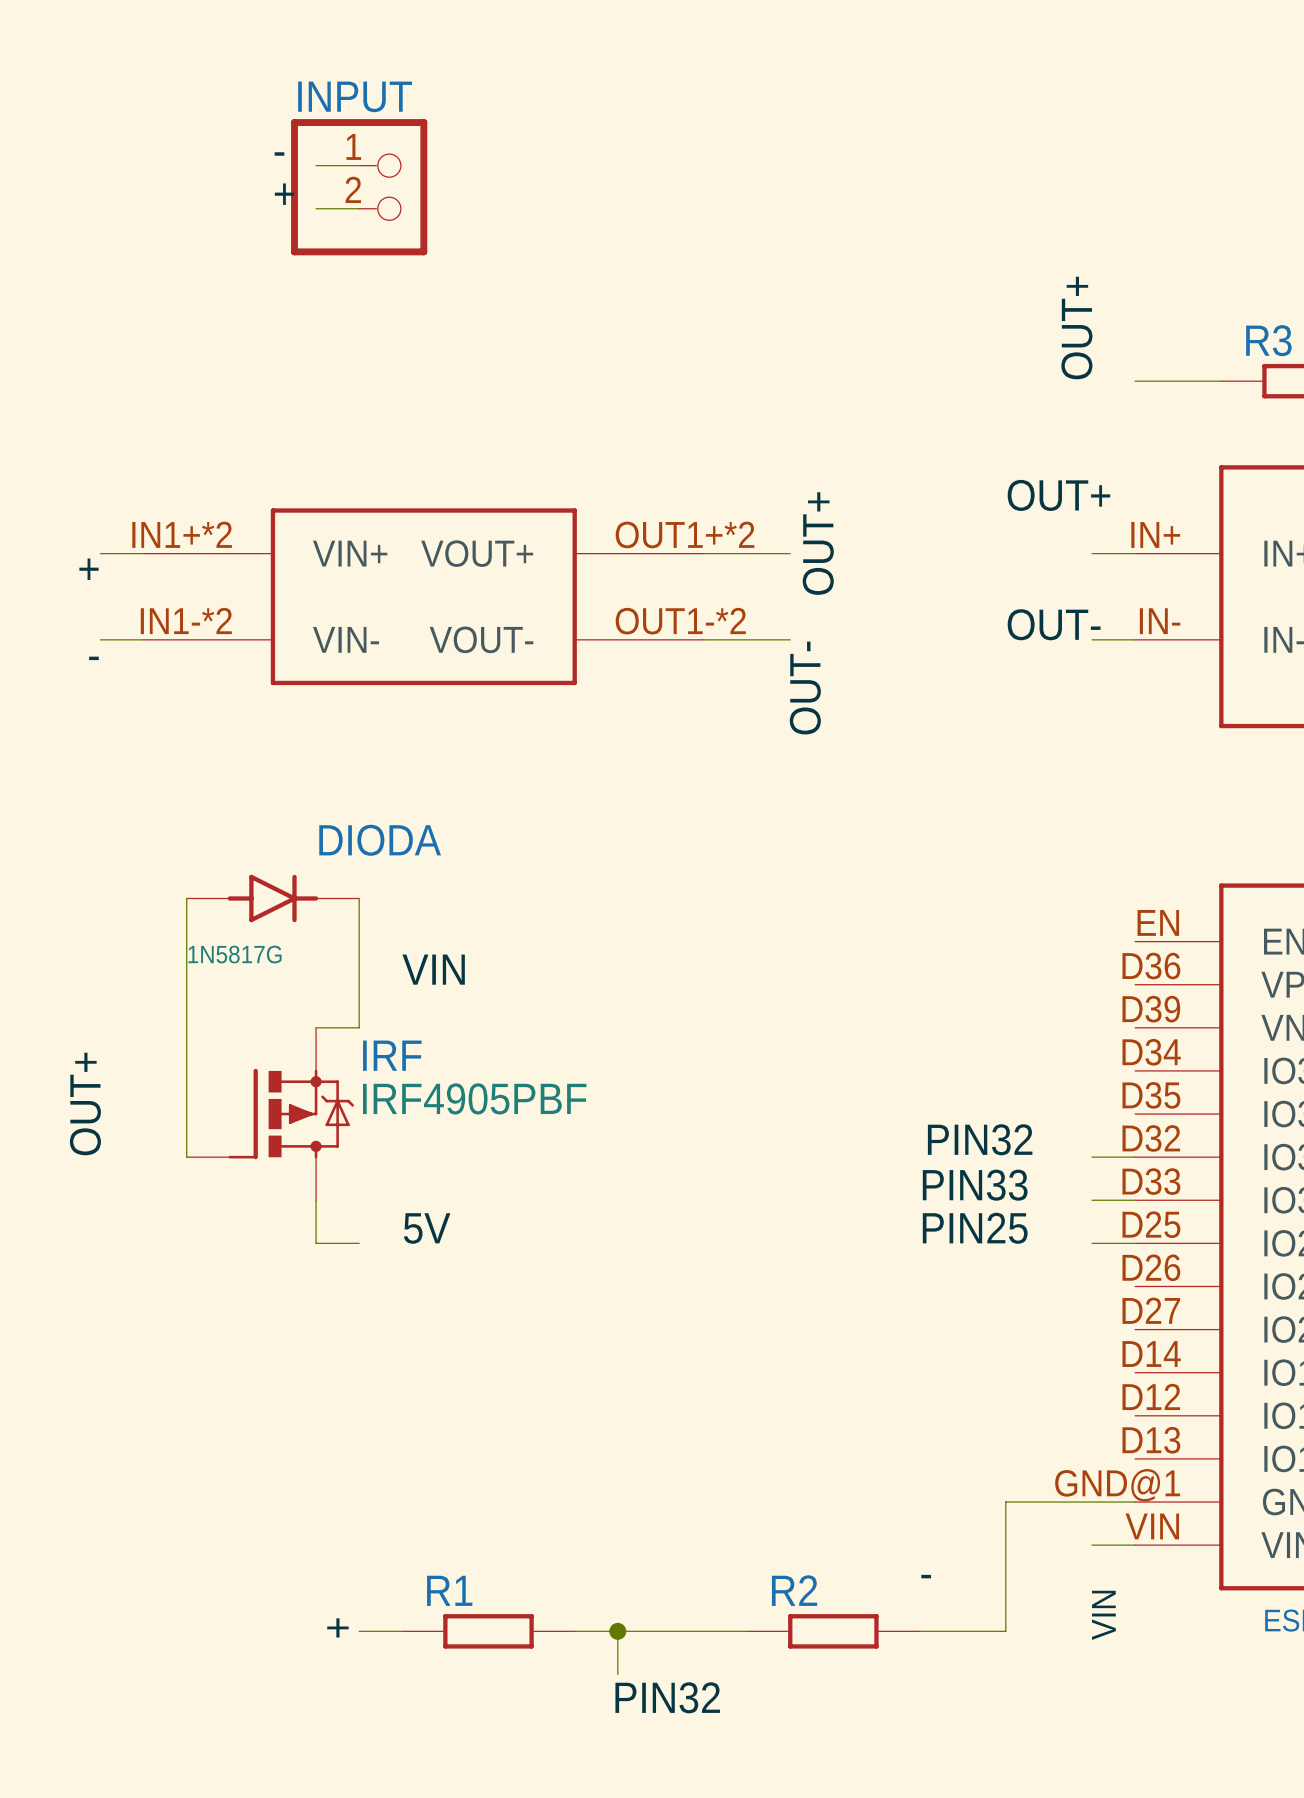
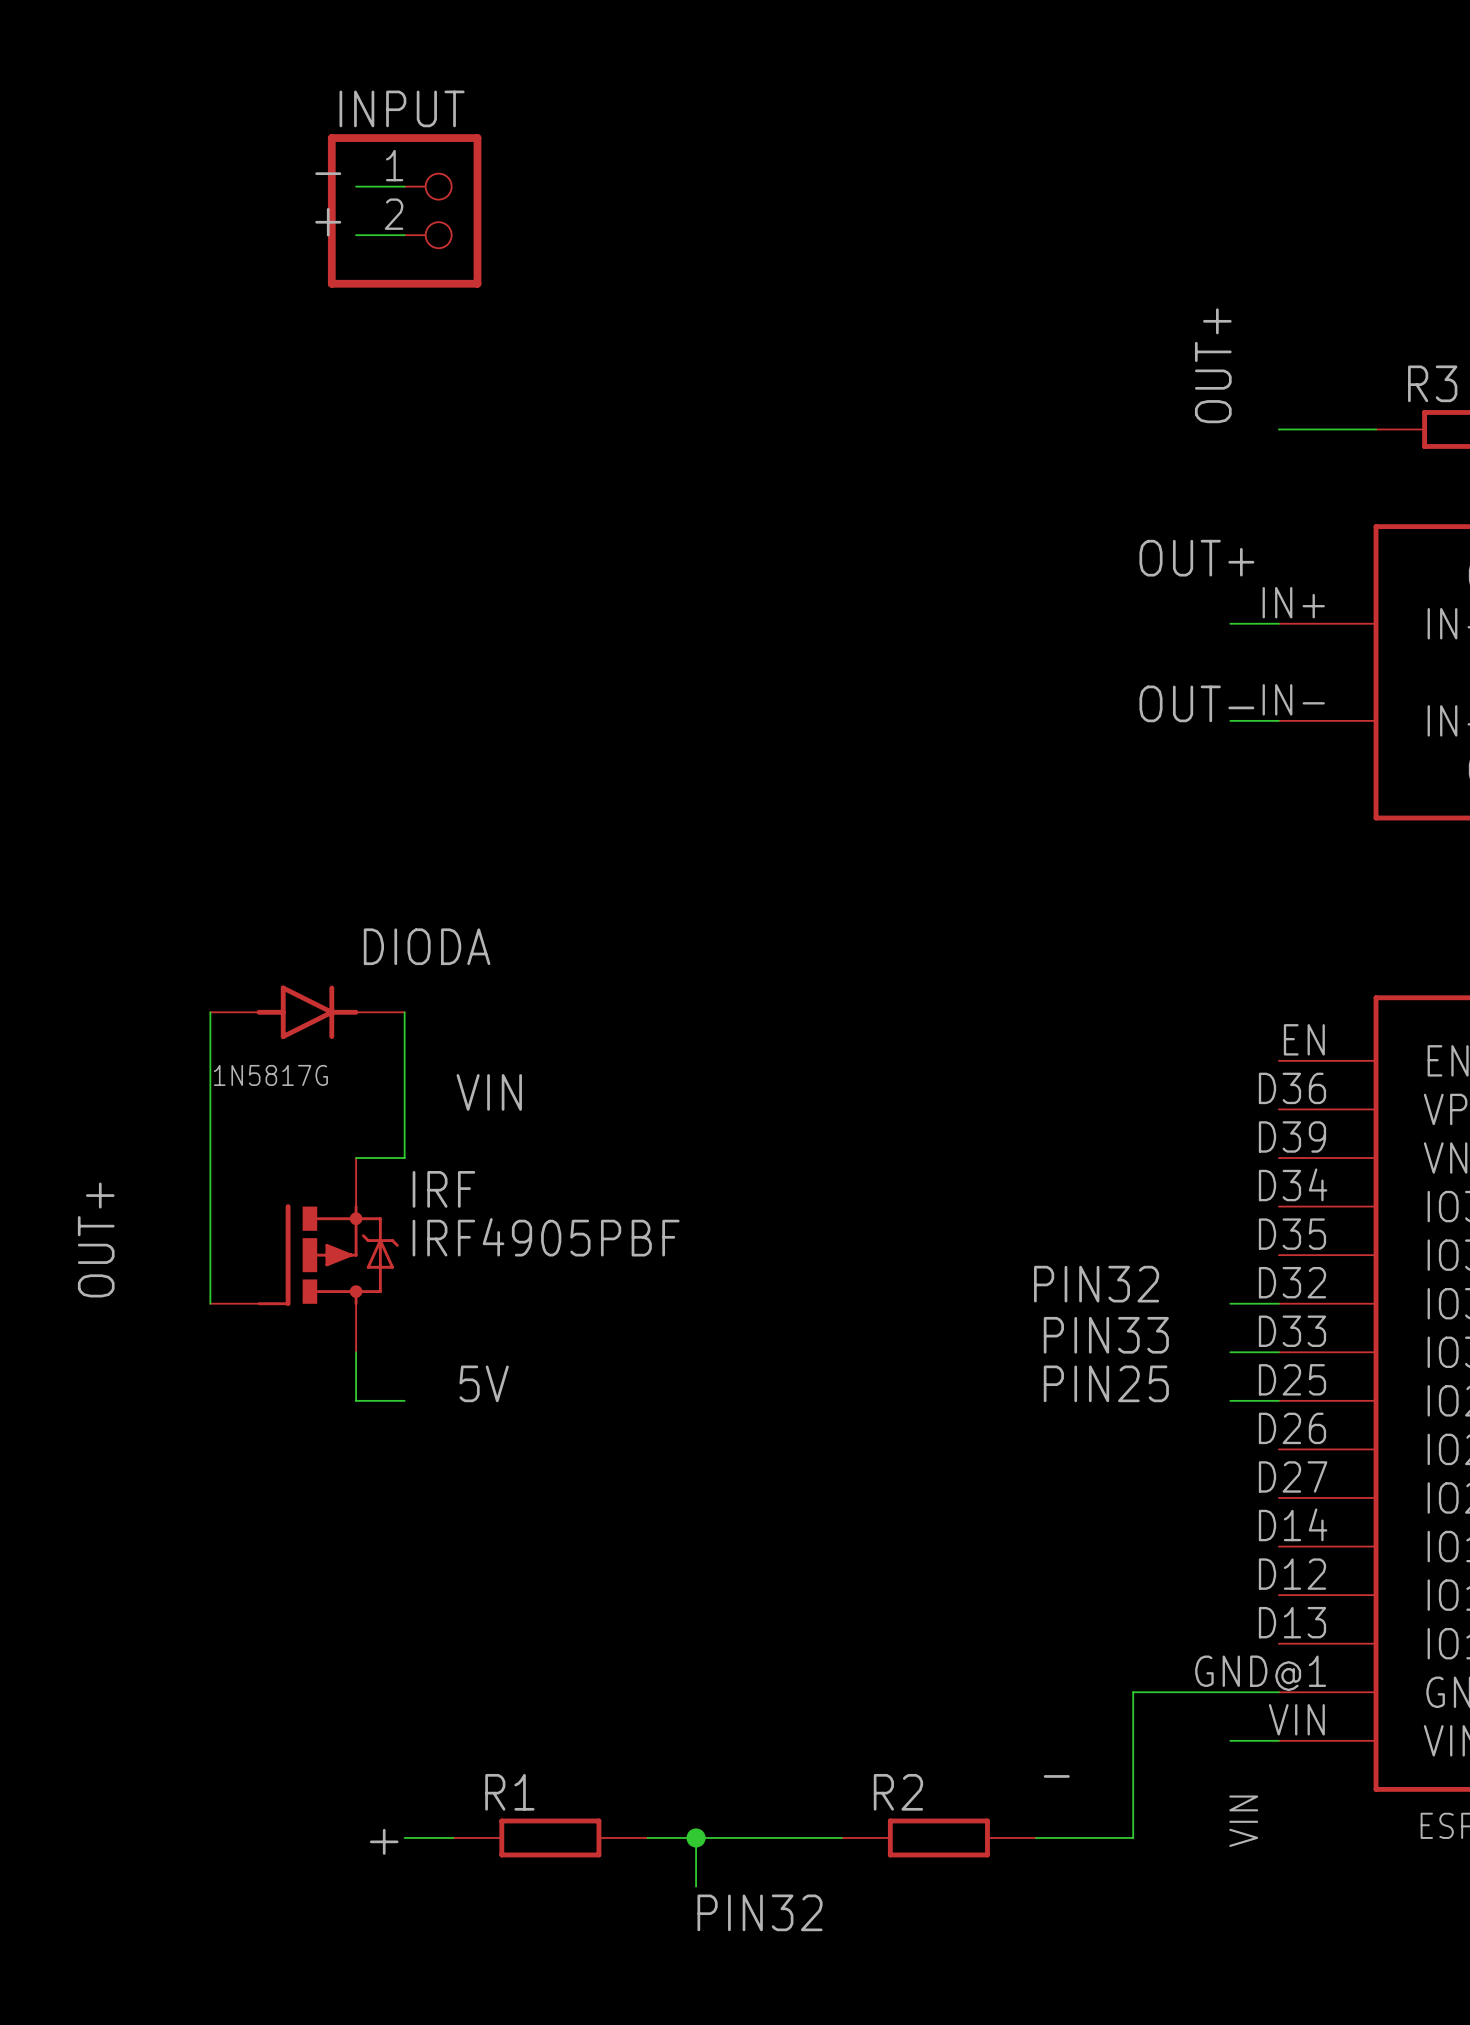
label: OUT+ (818, 543) -> none
wire: (100, 553) (143, 553) -> none
wire: (704, 553) (790, 553) -> none
label: + (88, 569) -> none
part: (423, 596) -> none
wire: (100, 639) (143, 639) -> none
wire: (704, 639) (790, 639) -> none
label: - (93, 658) -> none
label: OUT- (805, 688) -> none

